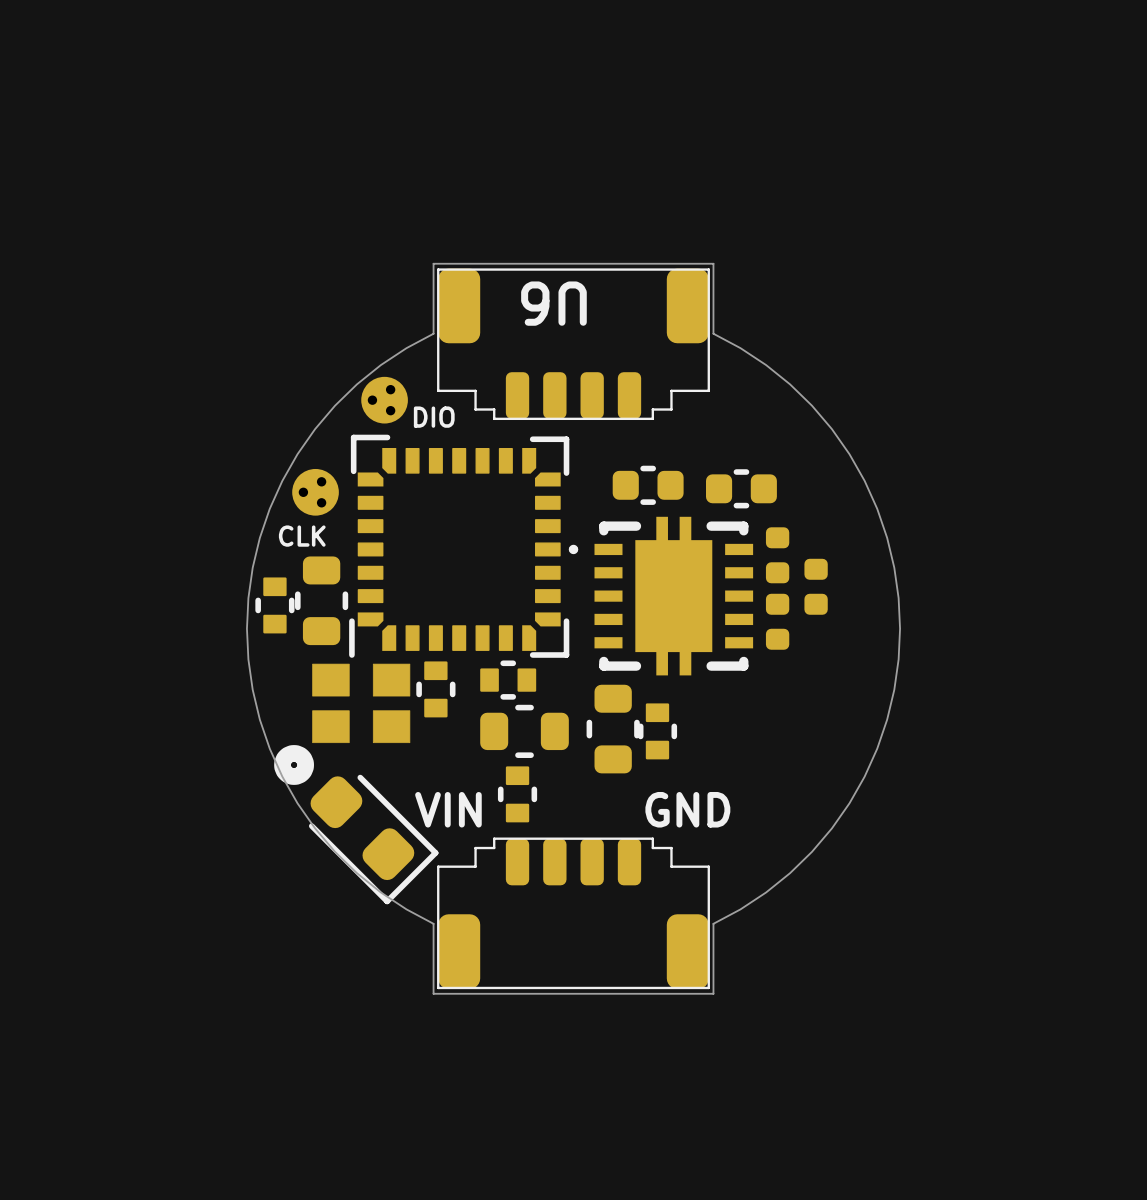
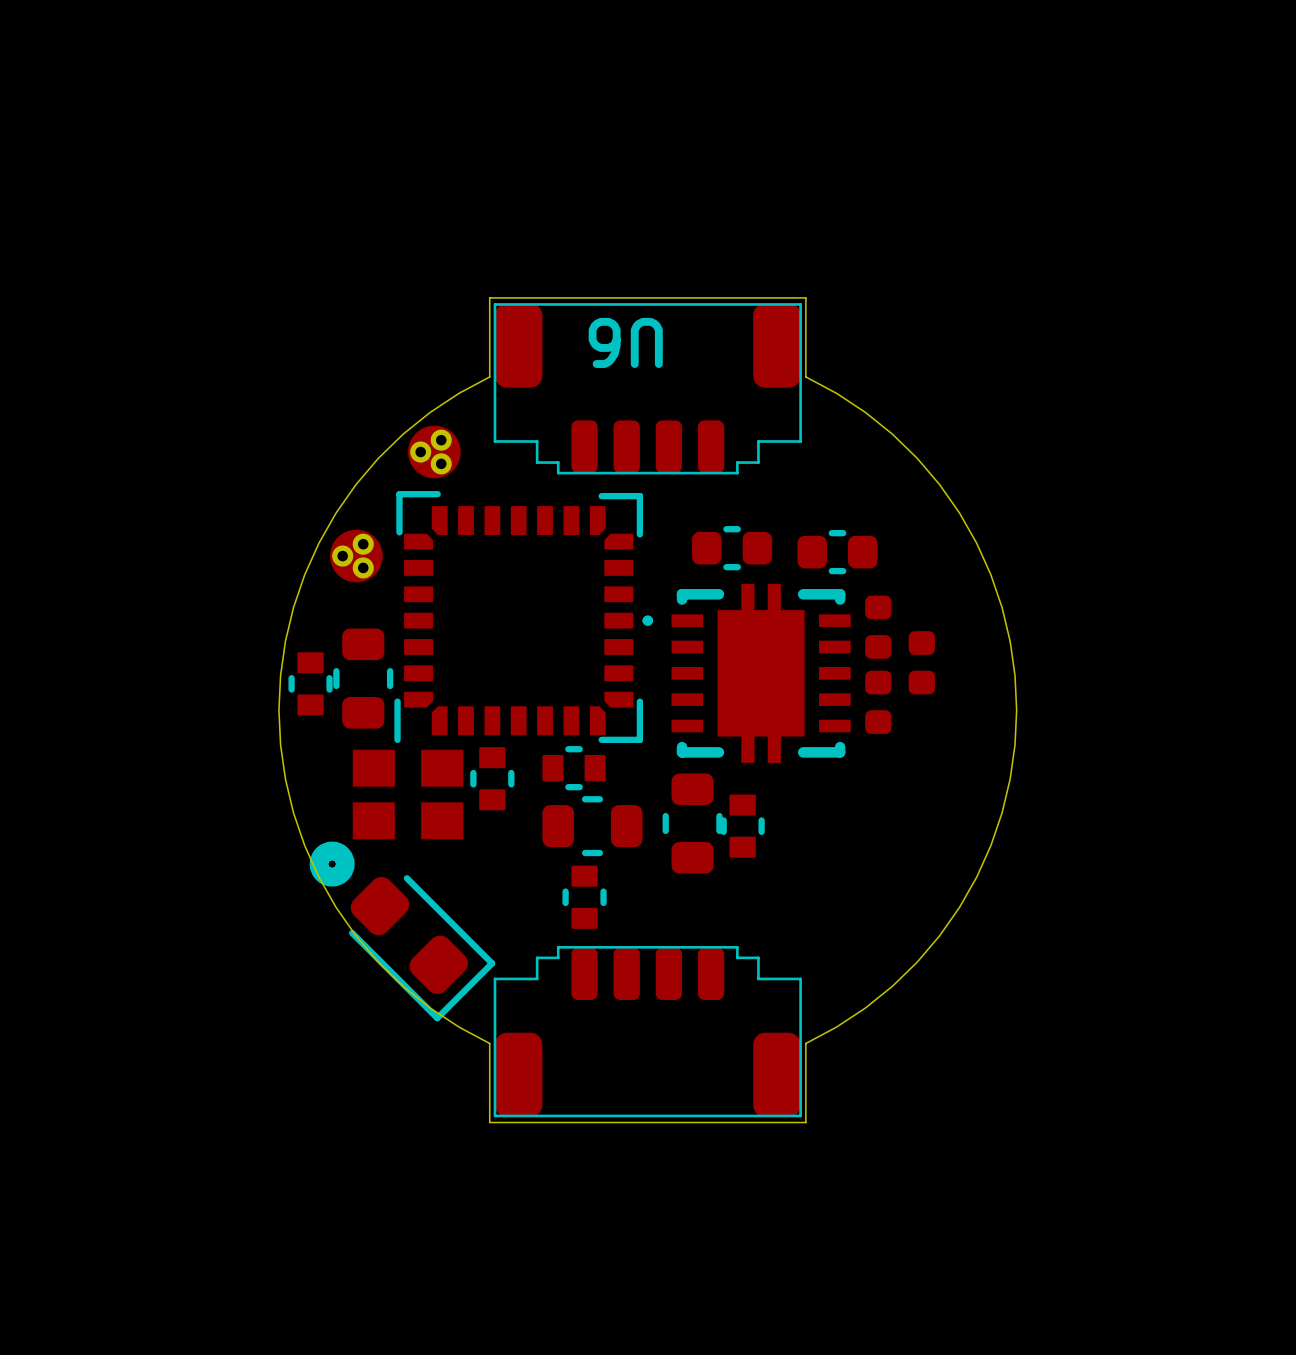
text: DIO (434, 417) -> none
text: CLK (302, 536) -> none
text: VIN (448, 809) -> none
text: GND (687, 809) -> none

